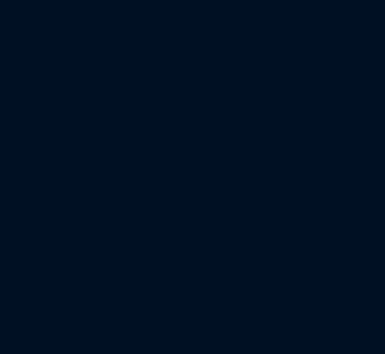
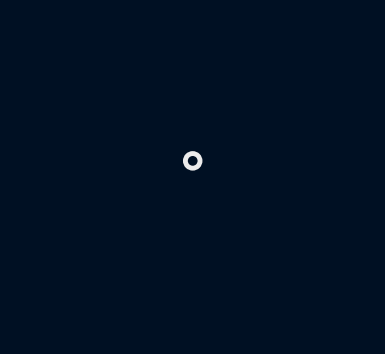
via: none -> (192, 160)

